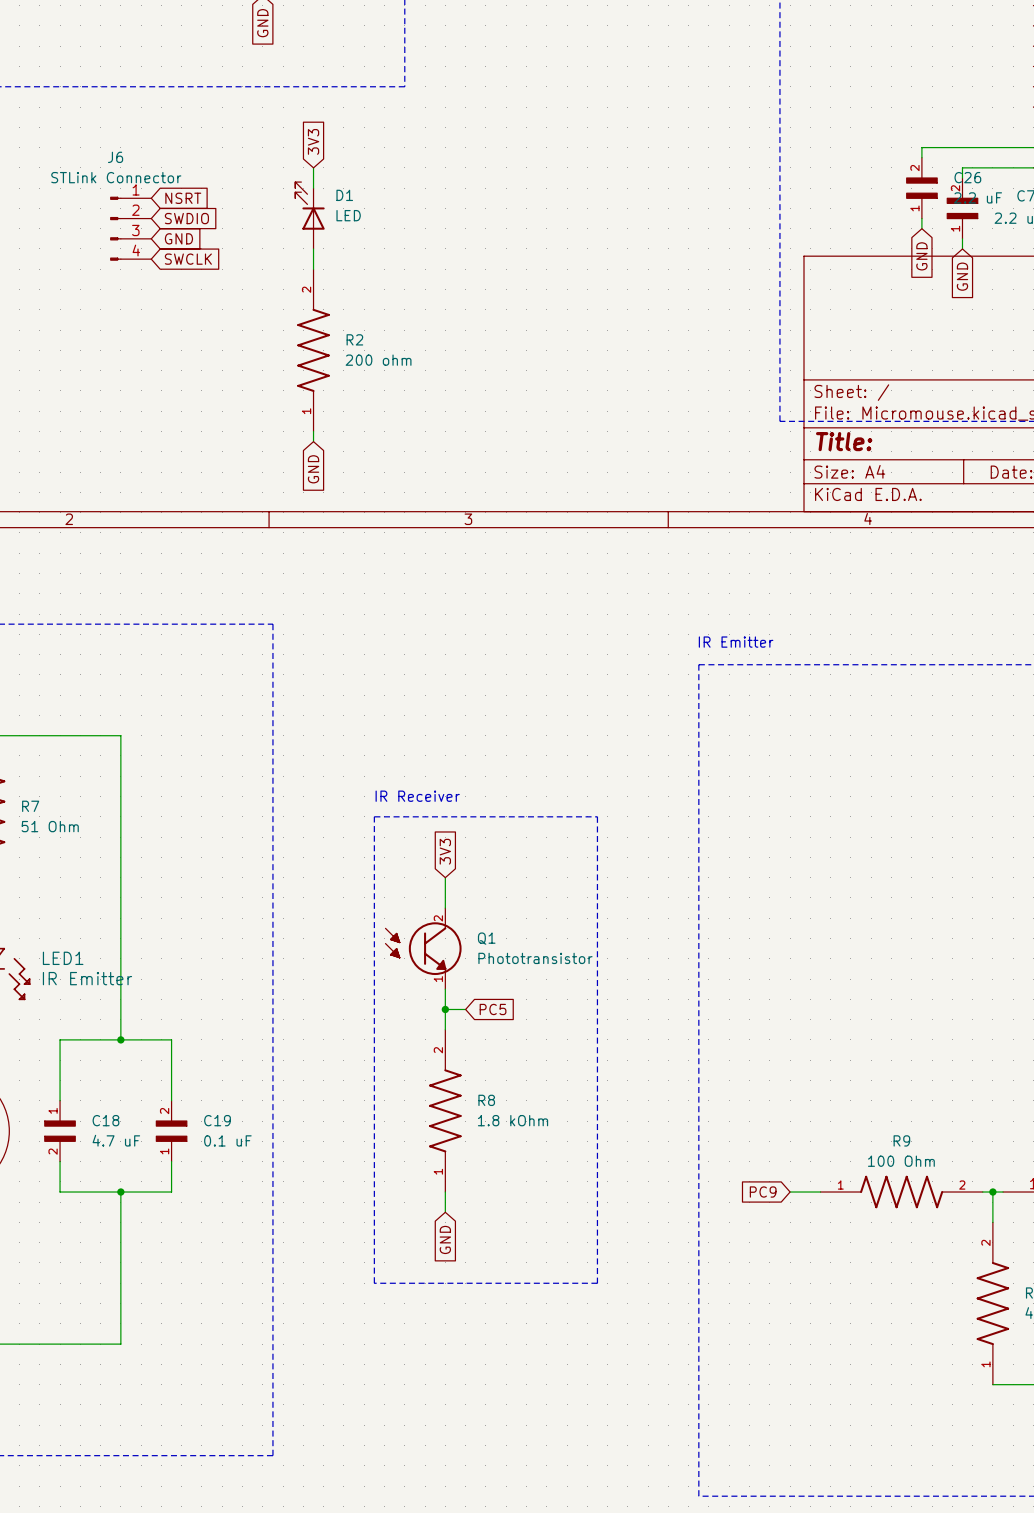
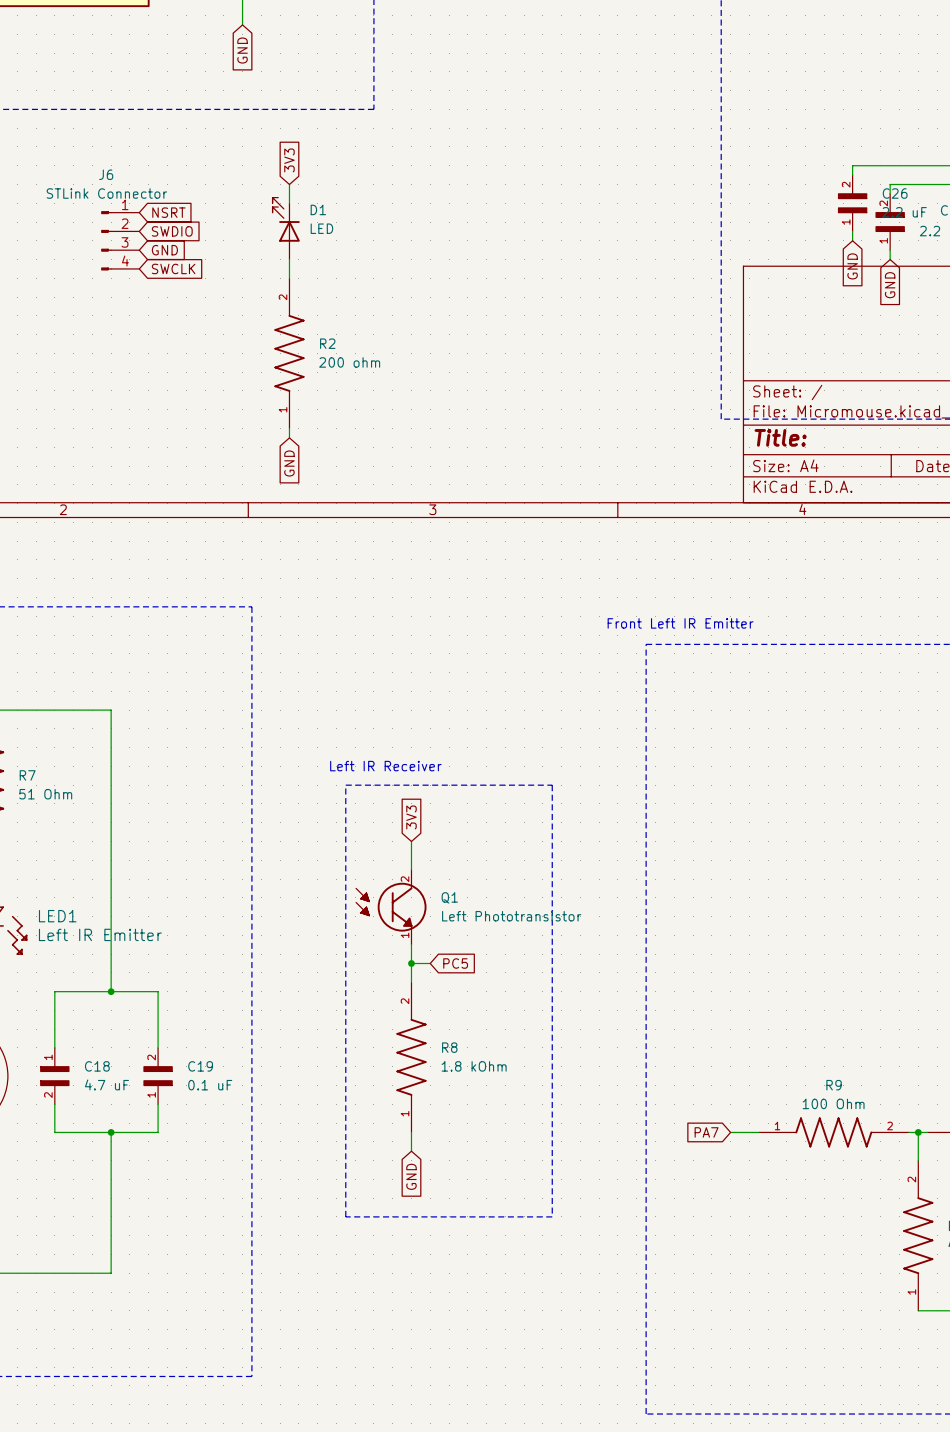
text: IR Emitter (736, 642) -> Front Left IR Emitter (680, 623)
text: IR Receiver (417, 796) -> Left IR Receiver (385, 766)
Q1 value: Phototransistor (535, 958) -> Left Phototransistor (511, 916)
LED1 value: IR Emitter (87, 978) -> Left IR Emitter (100, 934)
global label: PC9 (763, 1192) -> PA7 (706, 1132)

